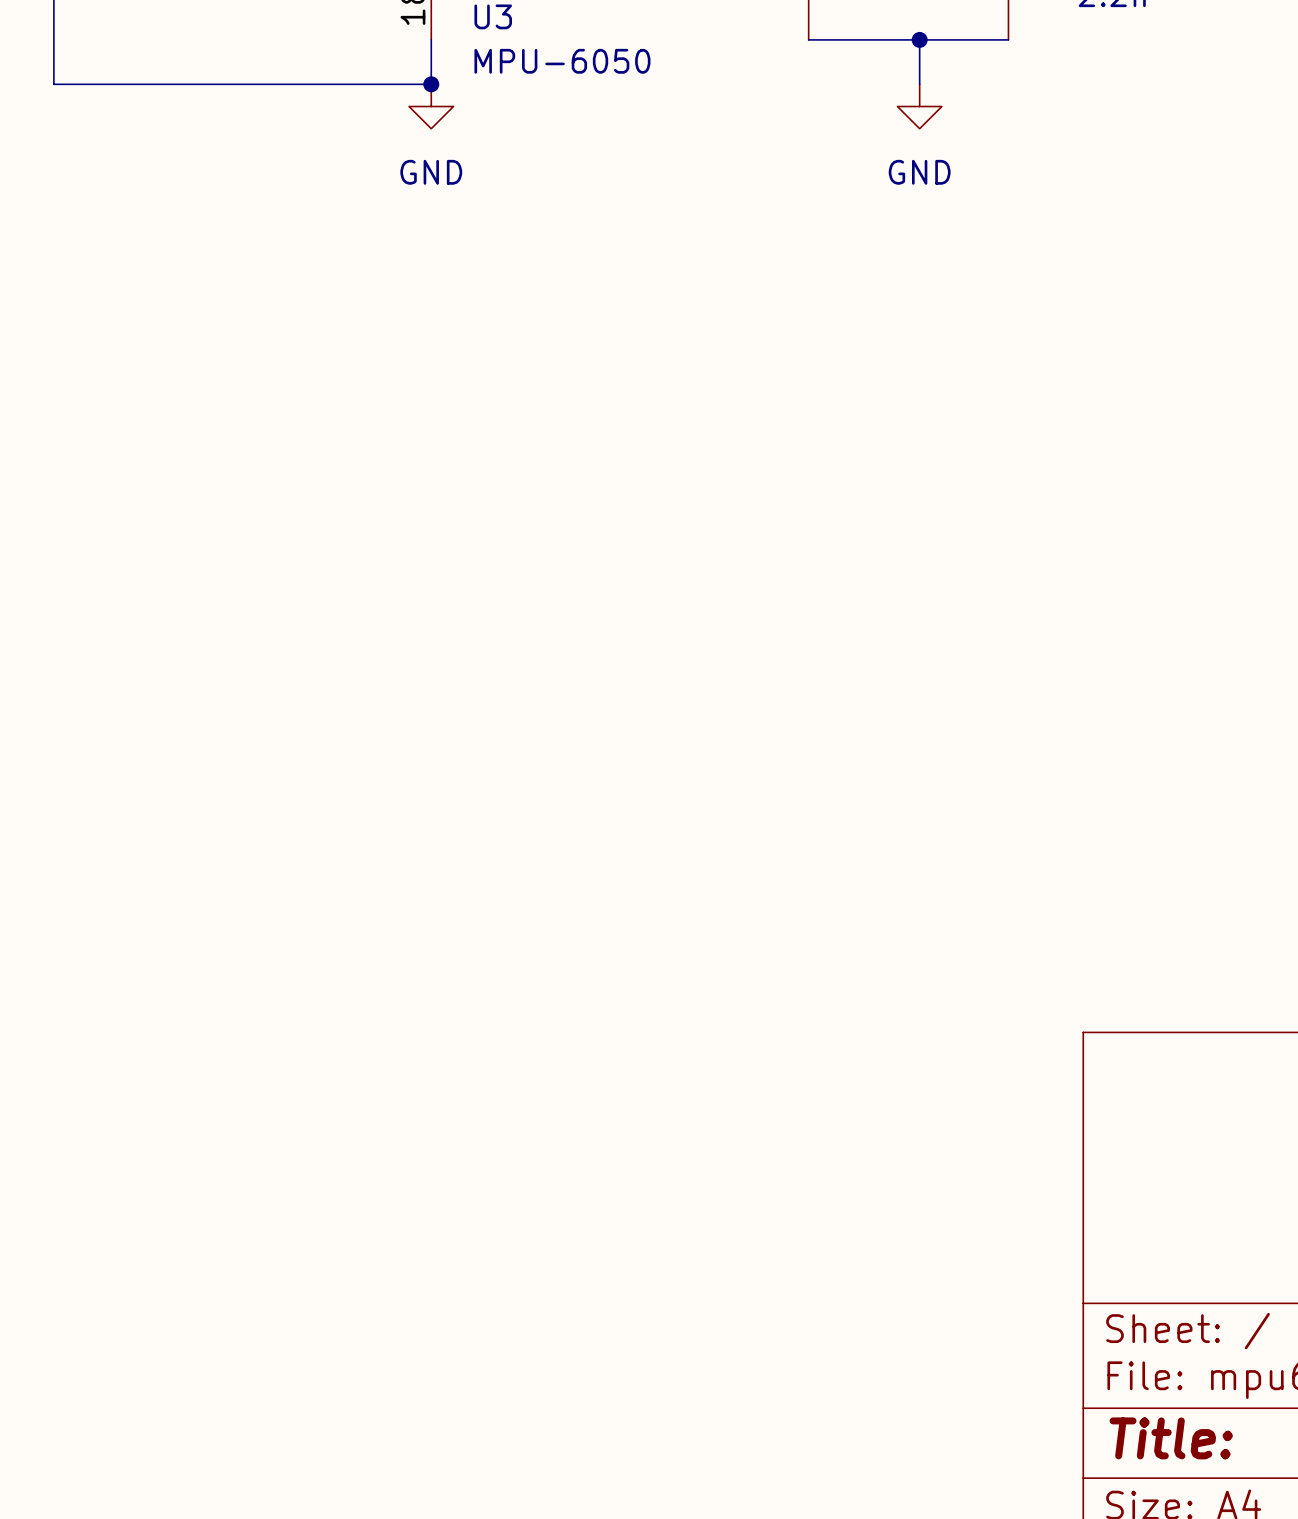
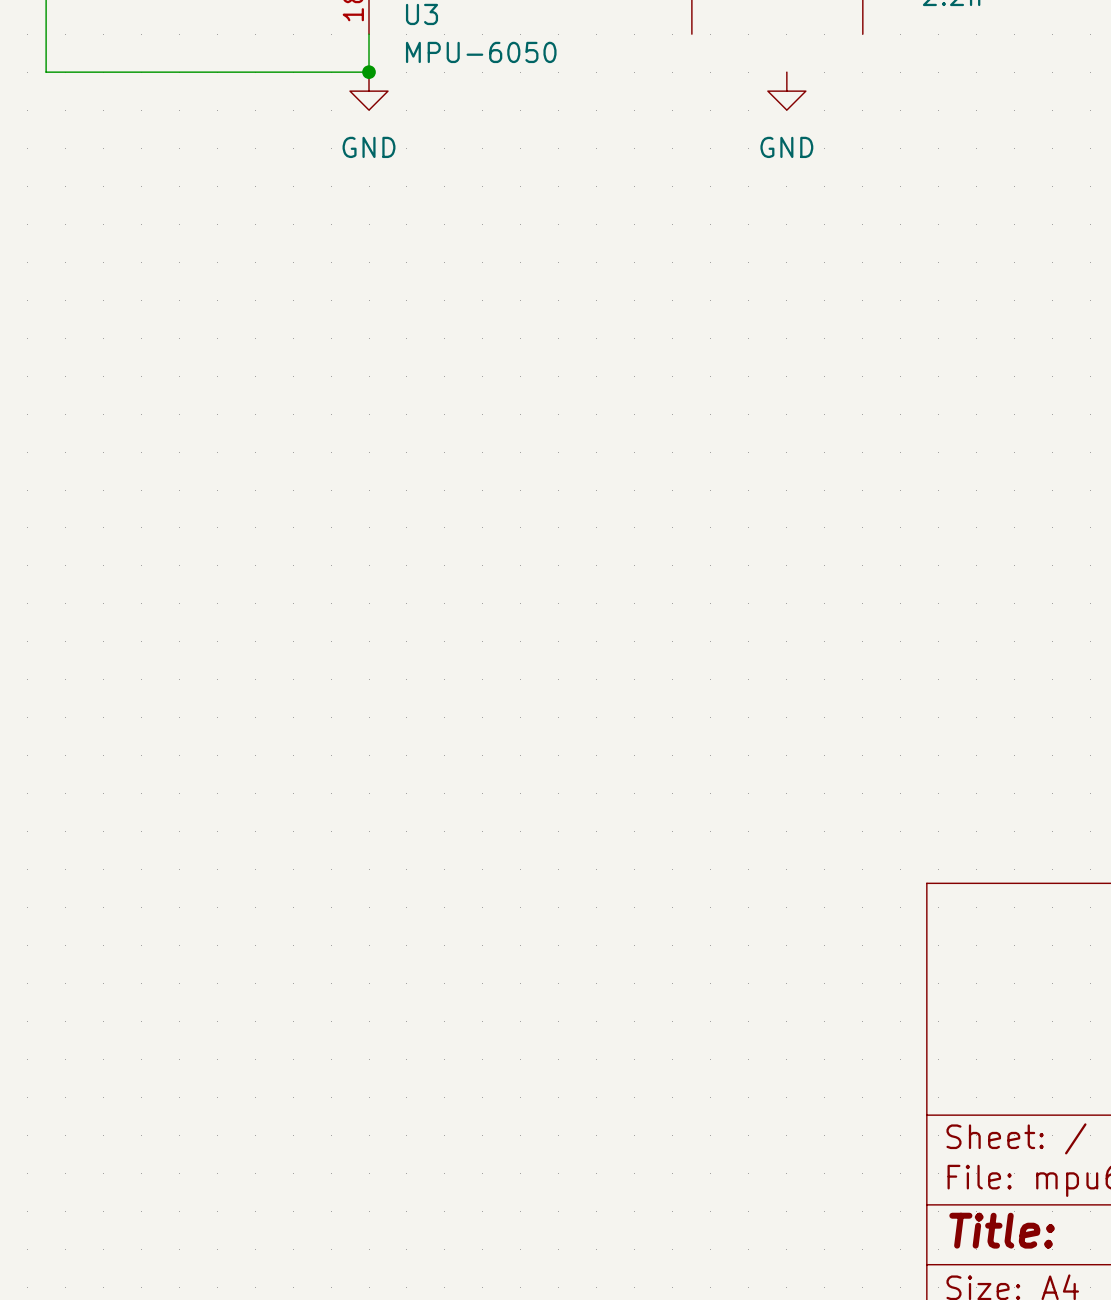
wire: (808, 39) (1008, 39) -> none
wire: (919, 39) (919, 84) -> none
junction: (919, 39) -> none

